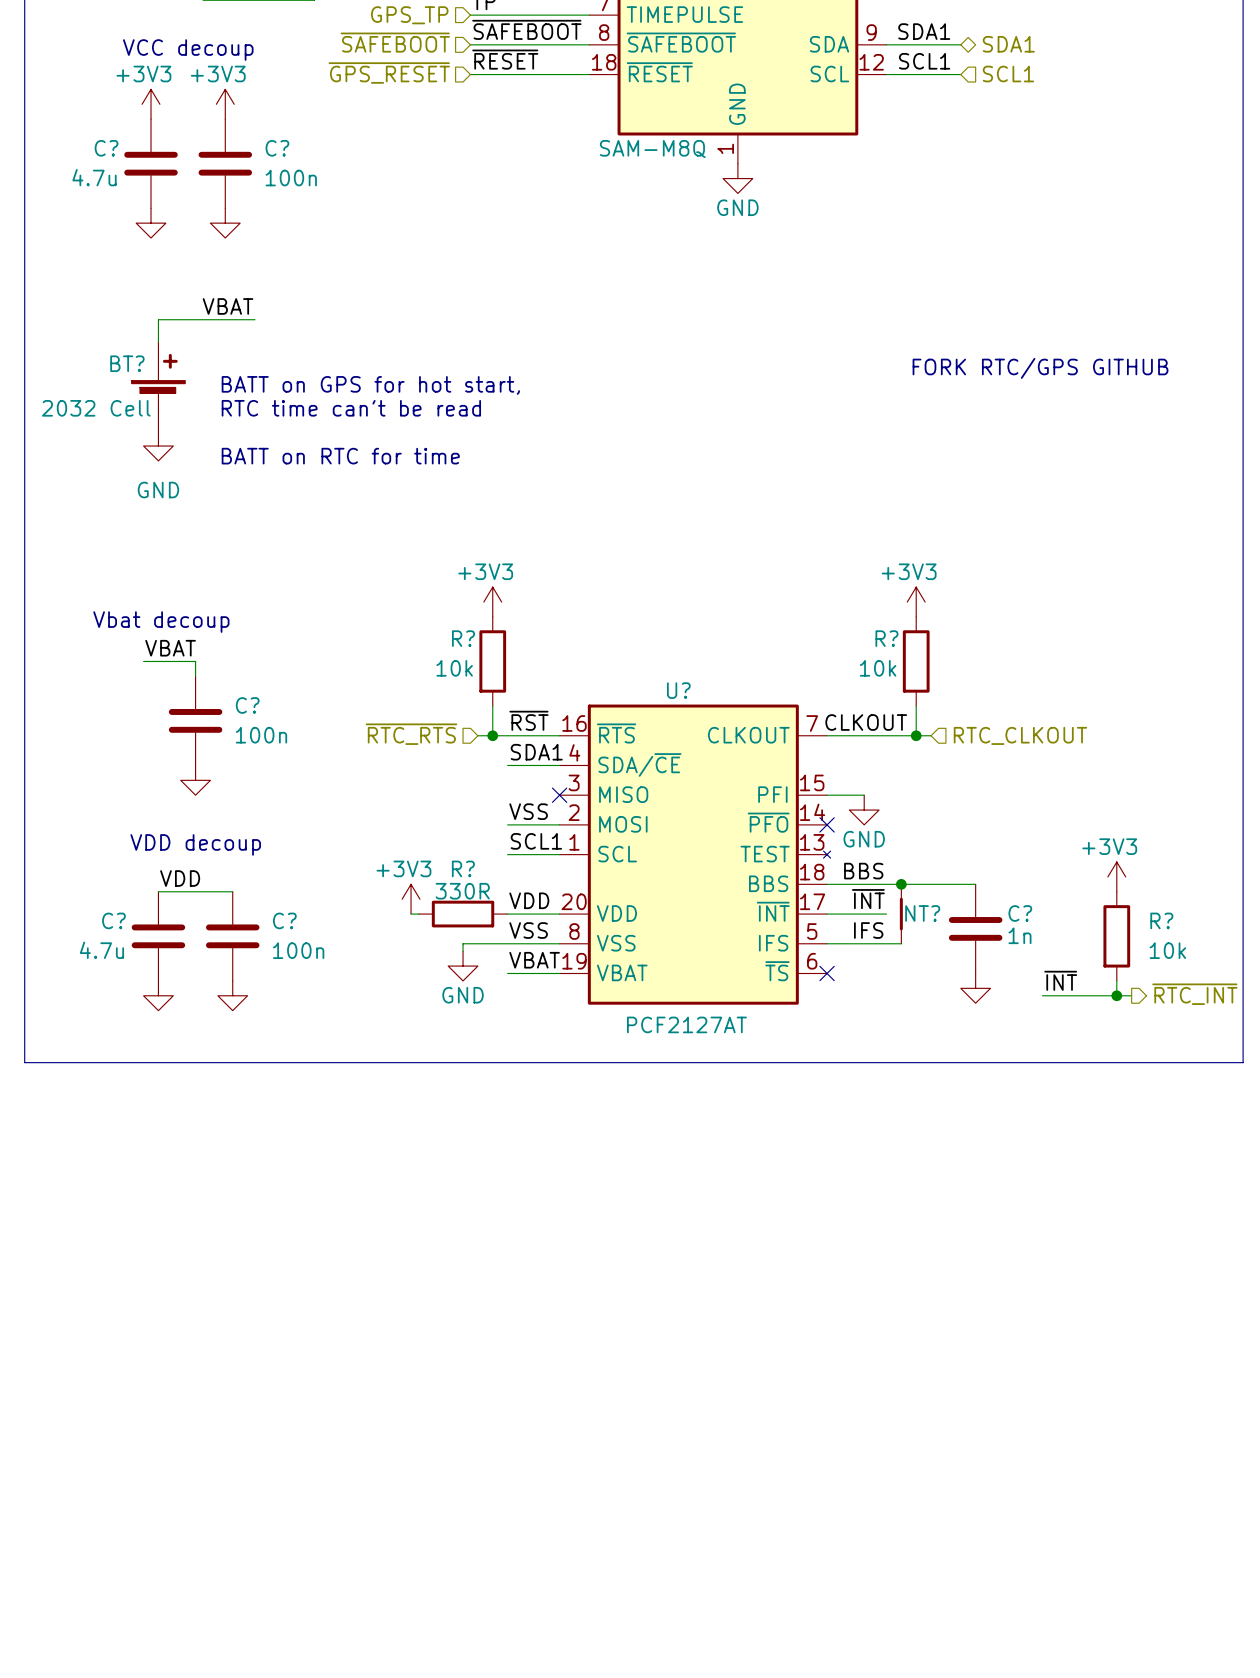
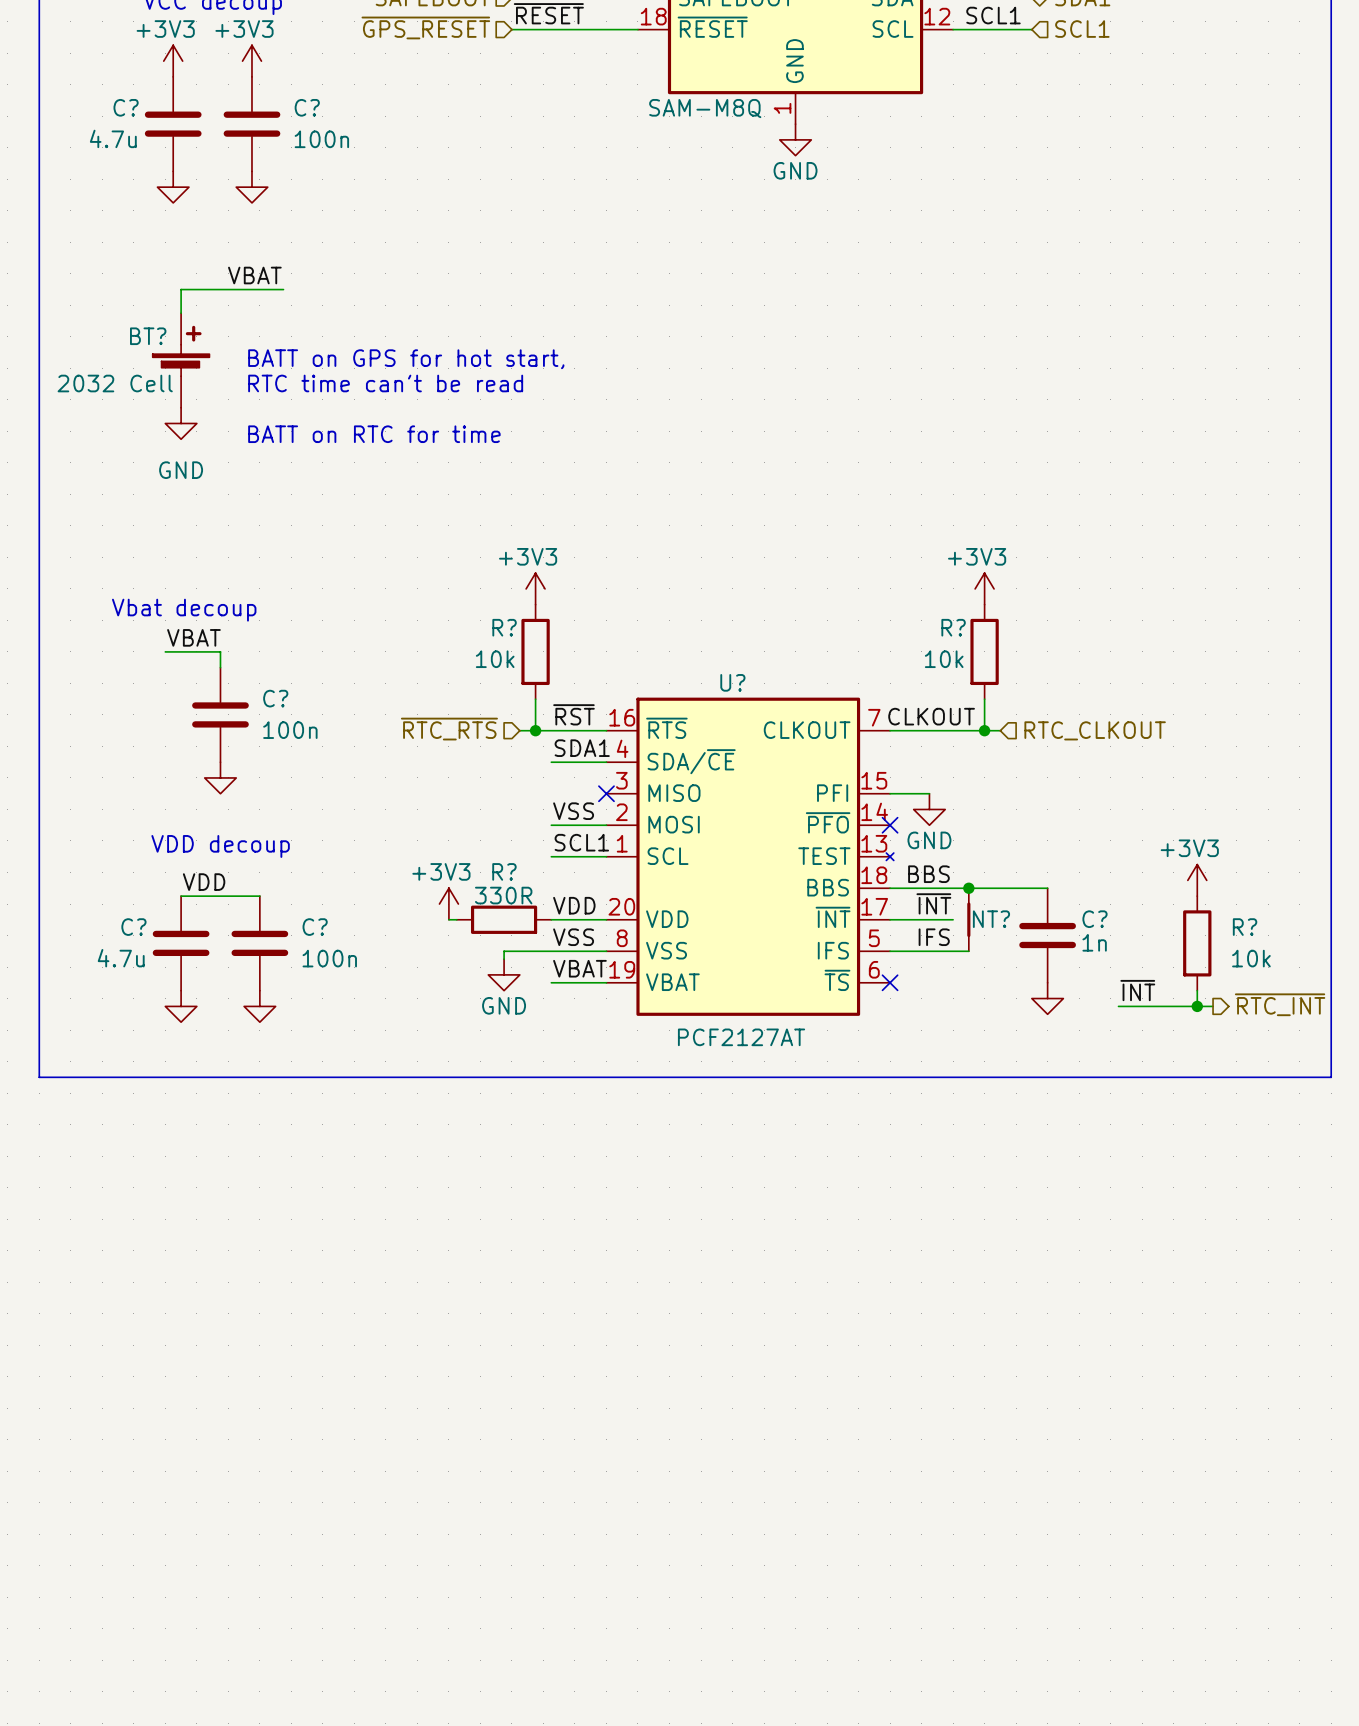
text: FORK RTC/GPS GITHUB (1040, 368) -> none

